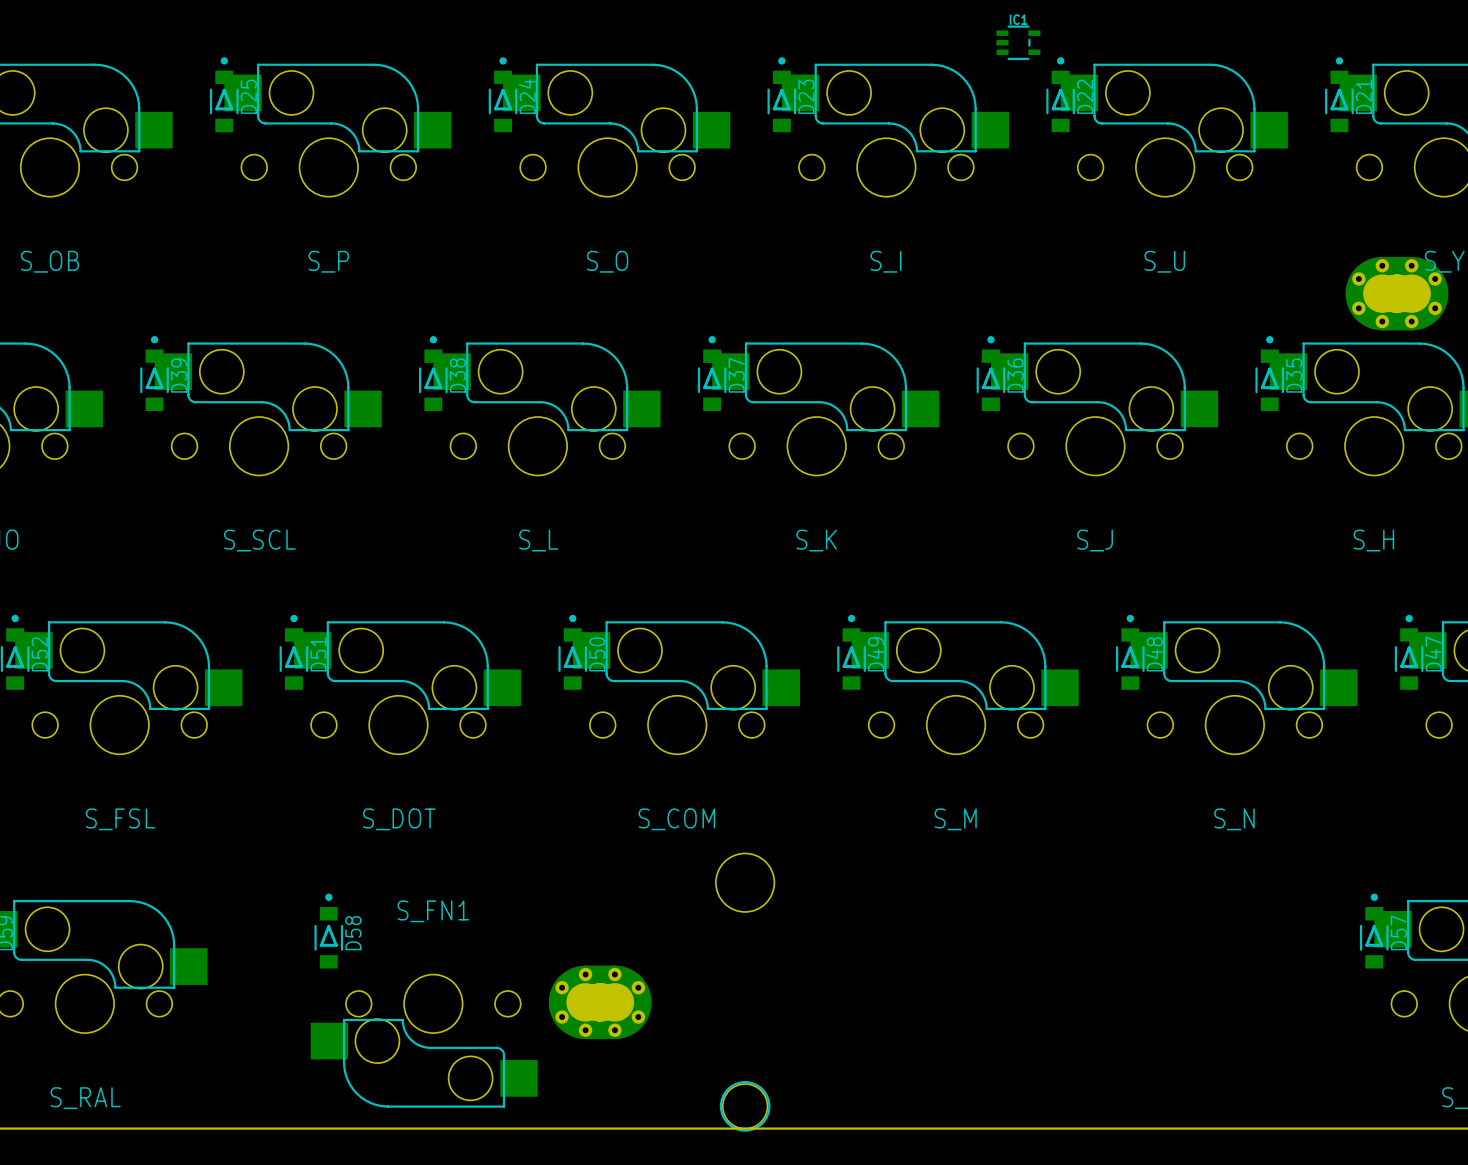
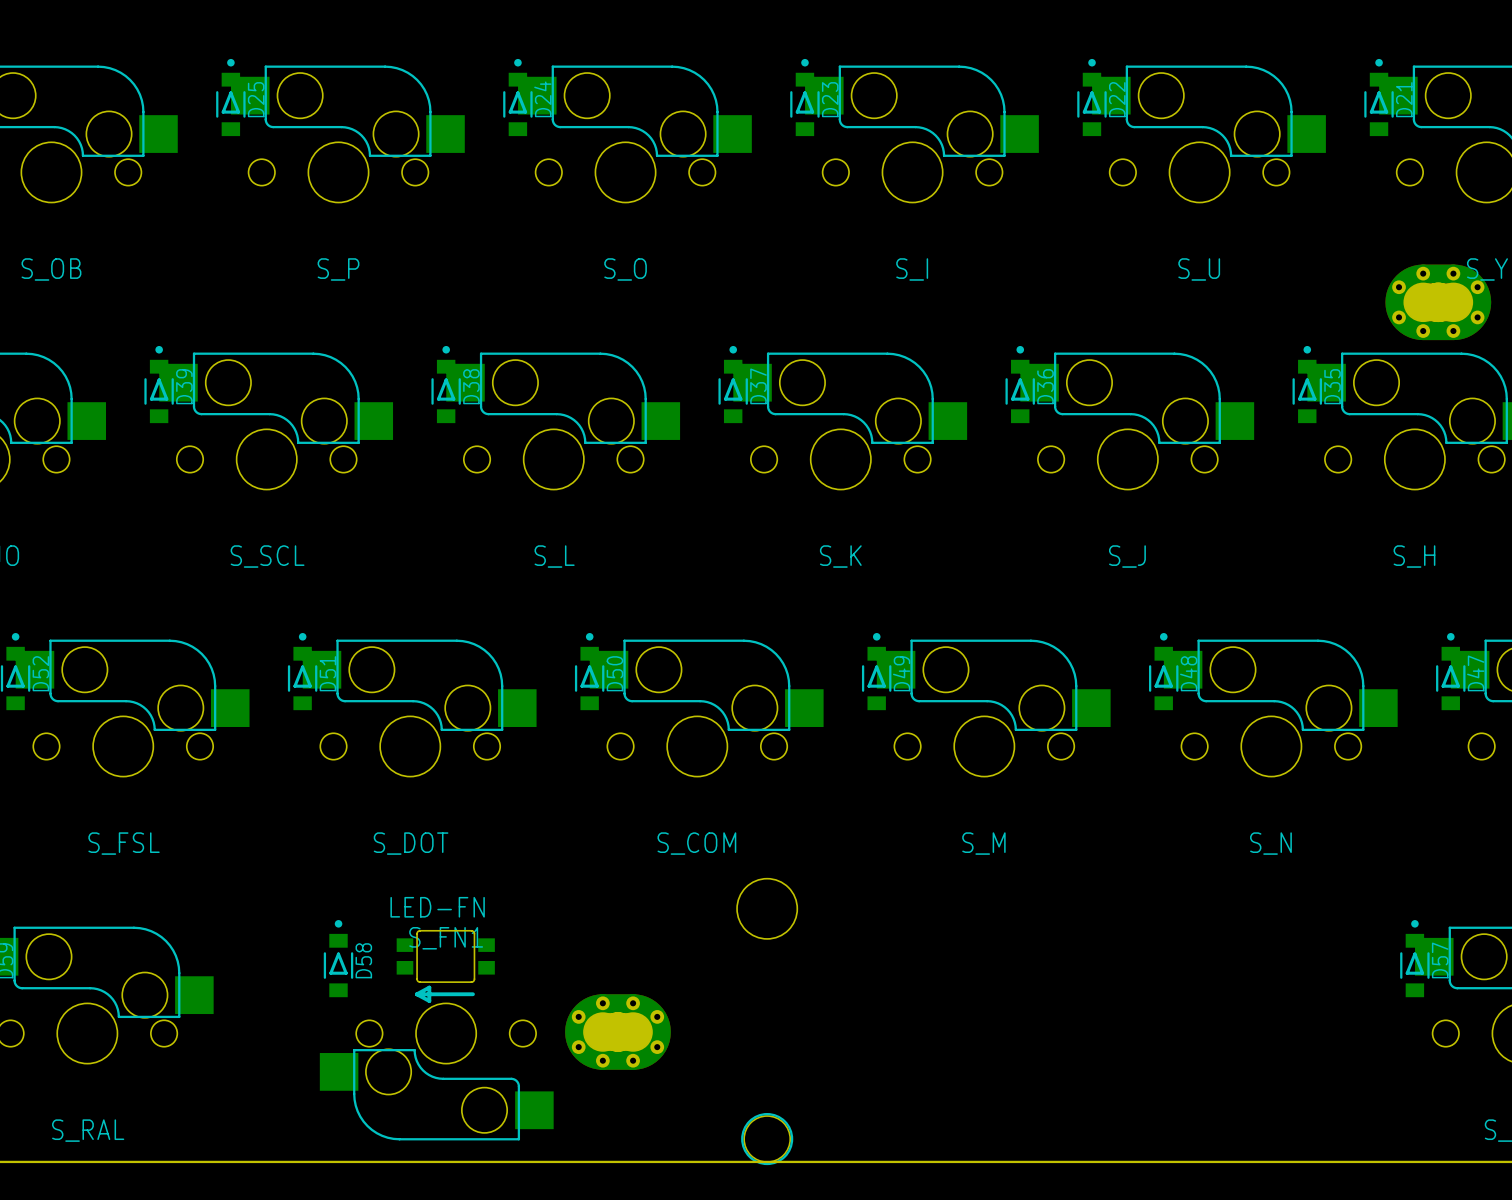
IC1: (1018, 42) -> none
LED-FN: none -> (445, 966)

